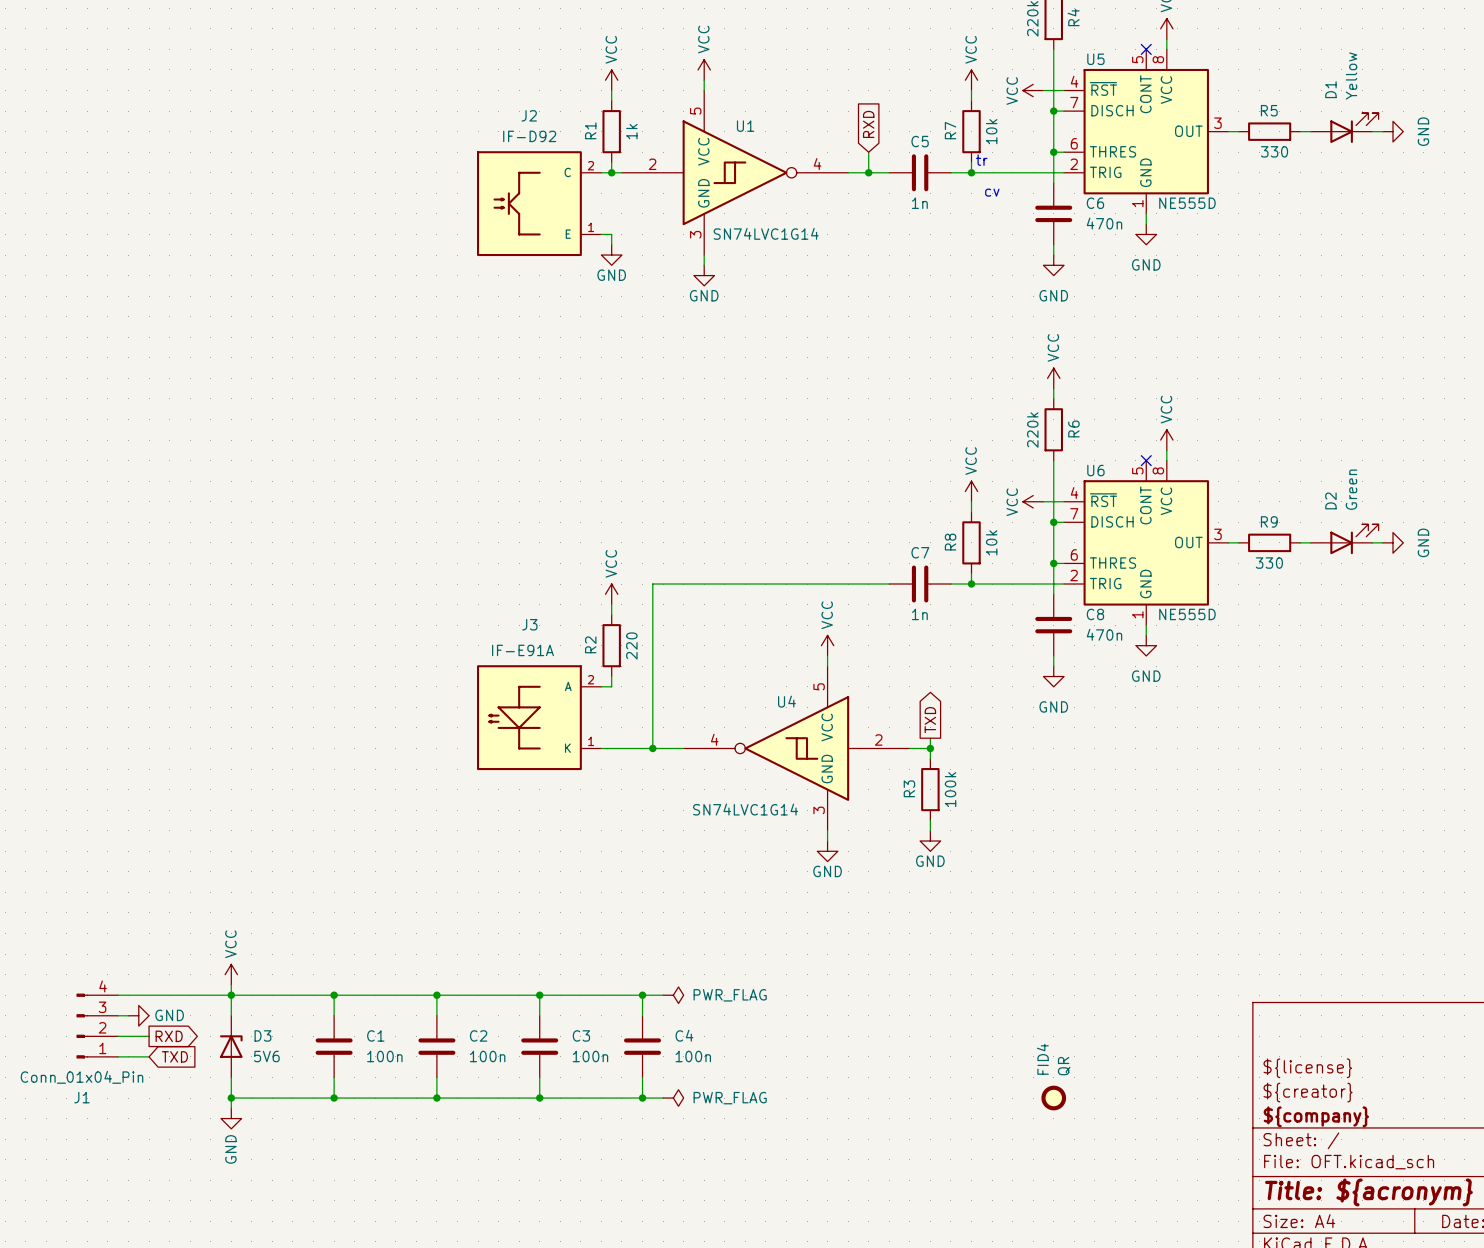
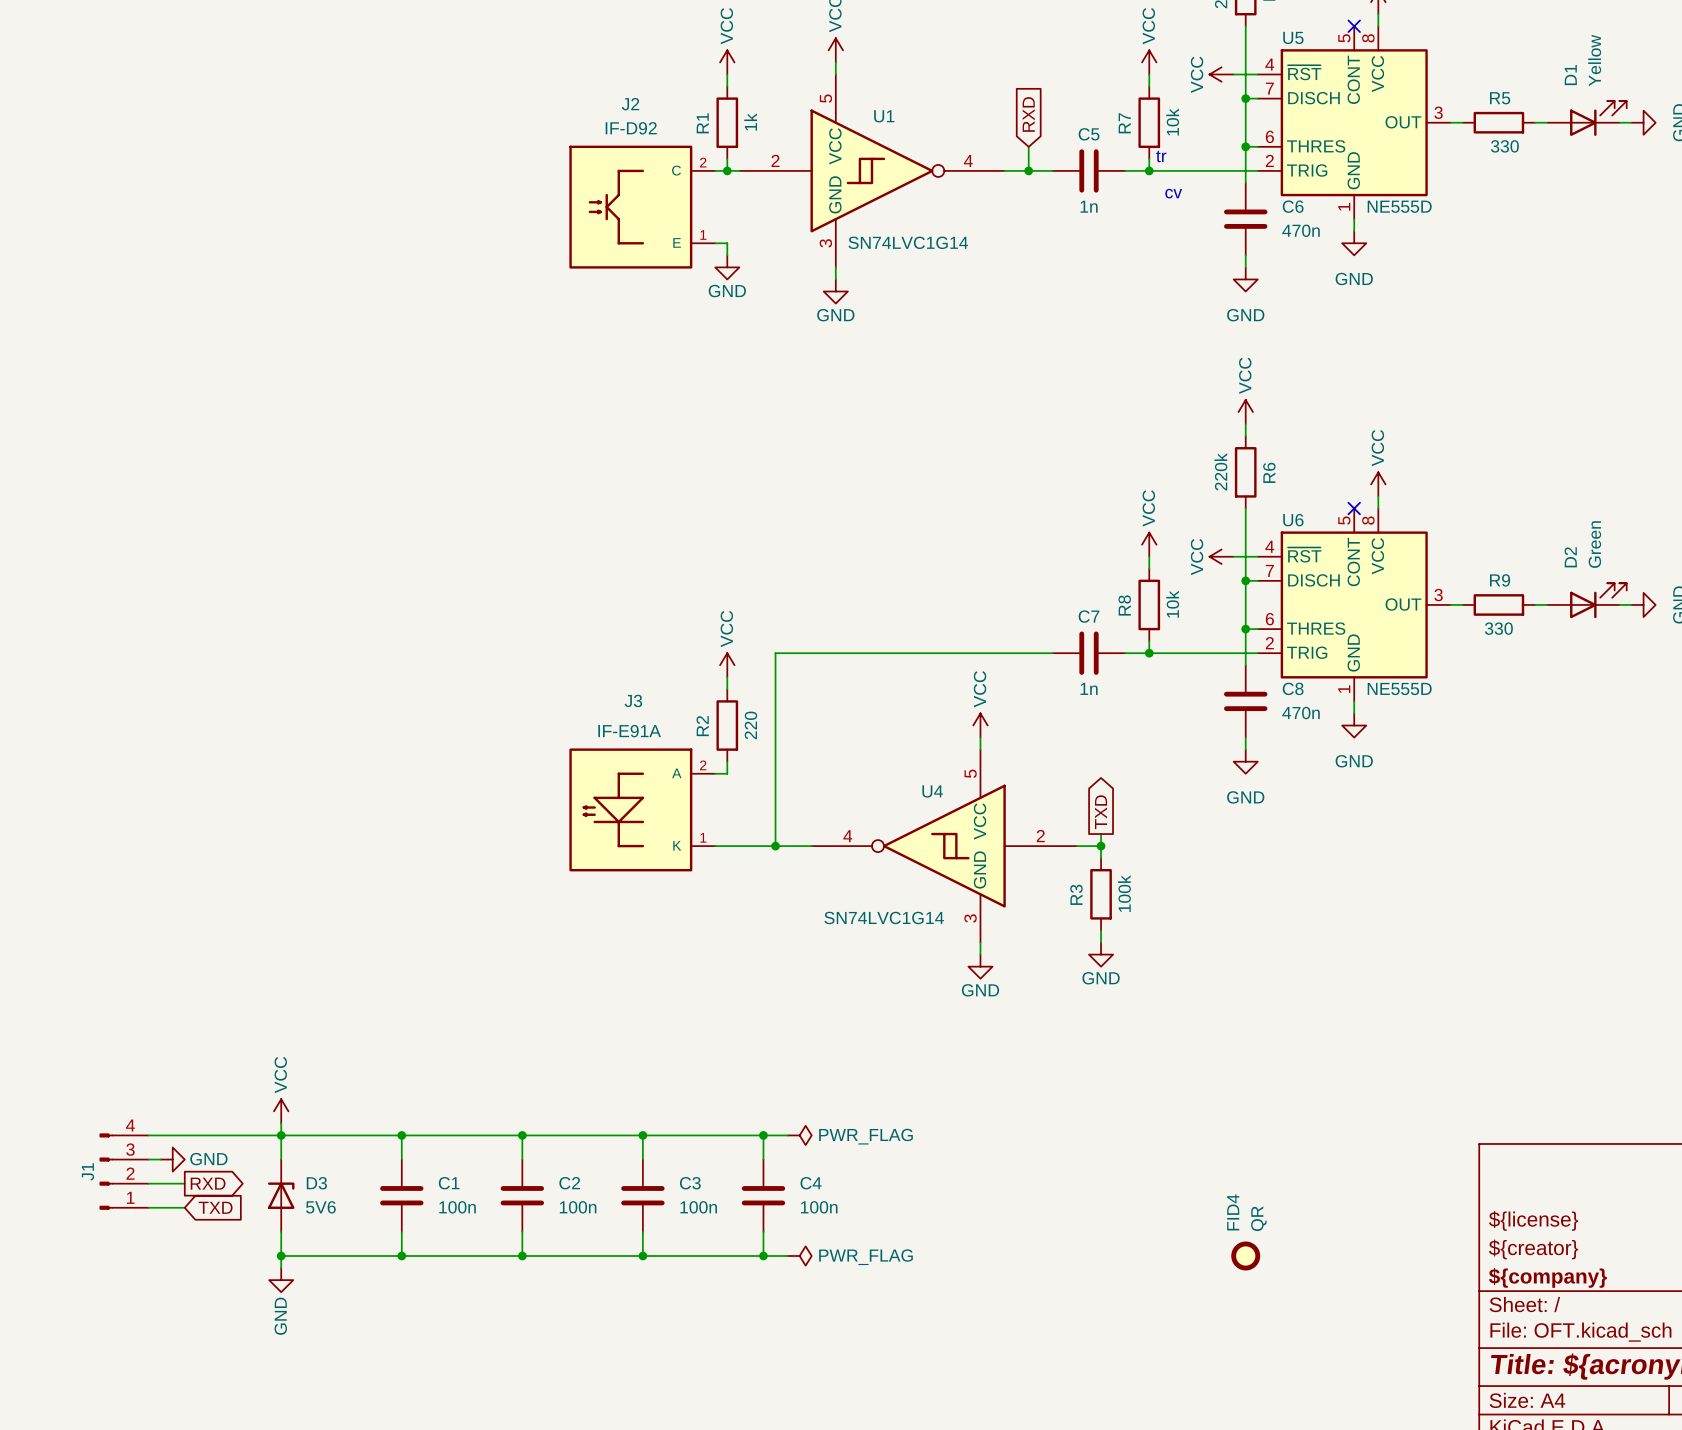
J1 value: Conn_01x04_Pin (81, 1077) -> none
J1 name rotation: 0° (81, 1097) -> 90° counterclockwise (87, 1171)
J1 name position: J1 (81, 1097) -> J1 (87, 1171)

